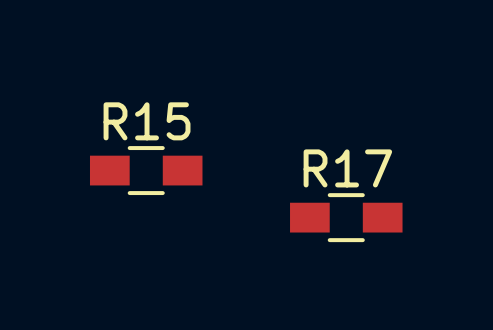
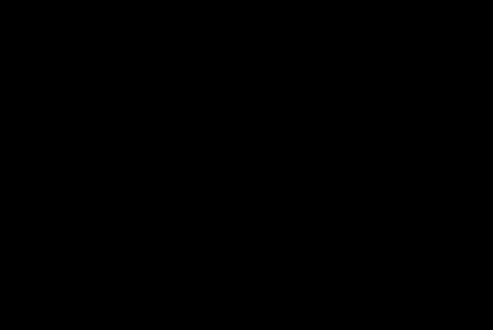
R15: (146, 170) -> none
R17: (346, 217) -> none

